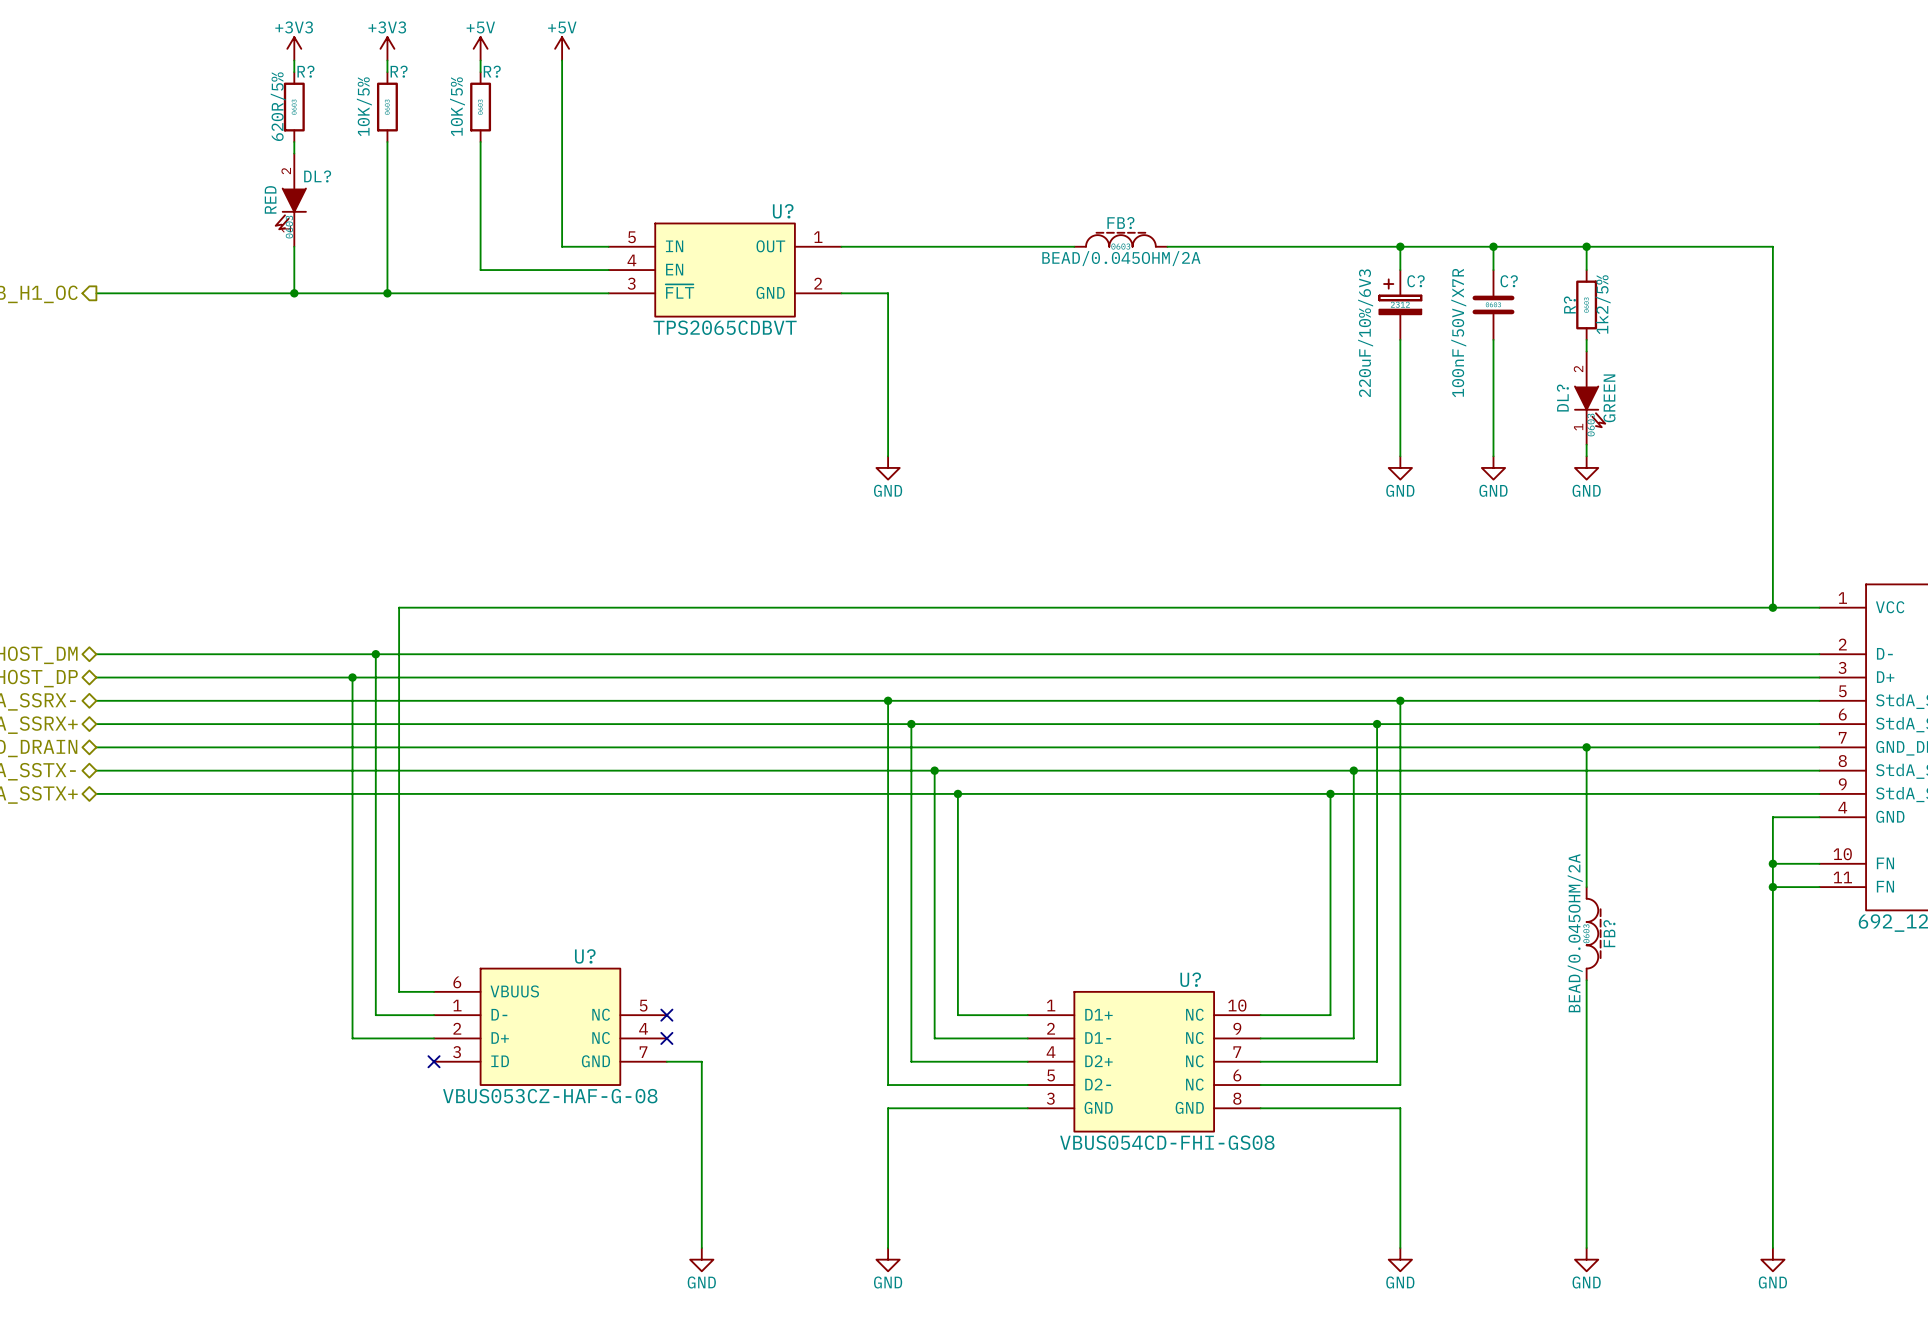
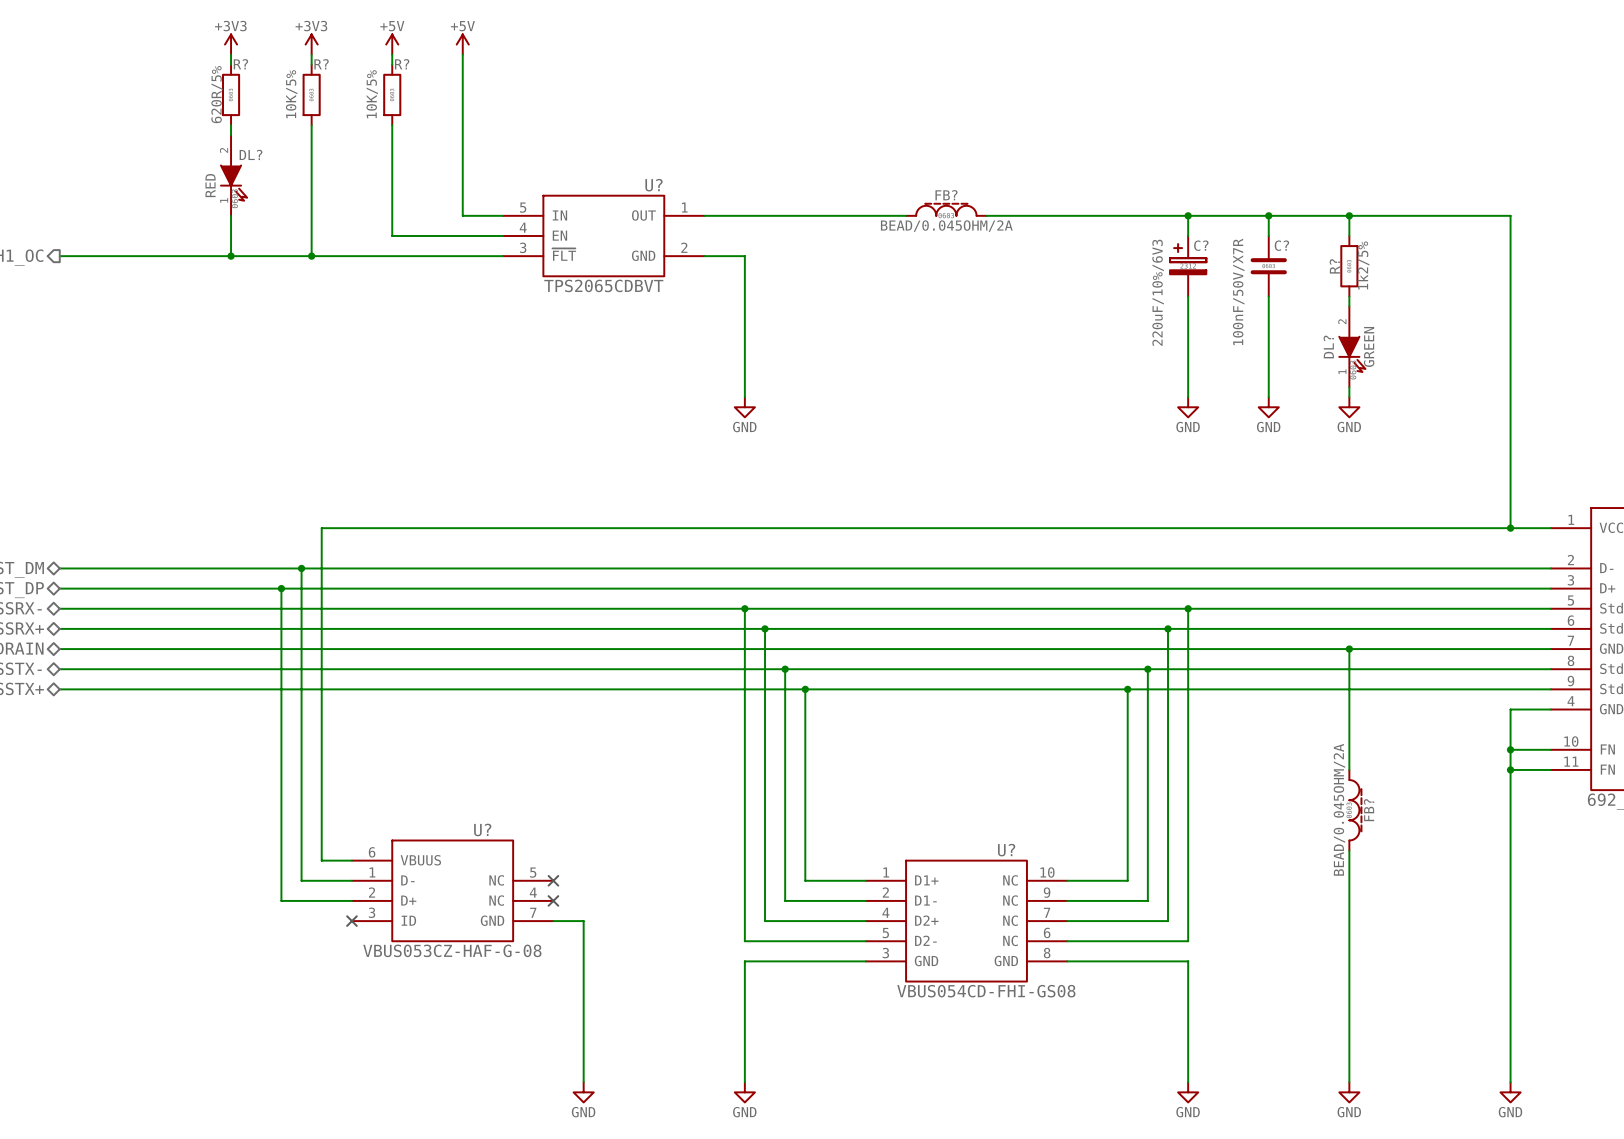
DL? flip: as is (290, 208) -> left-right (234, 183)

